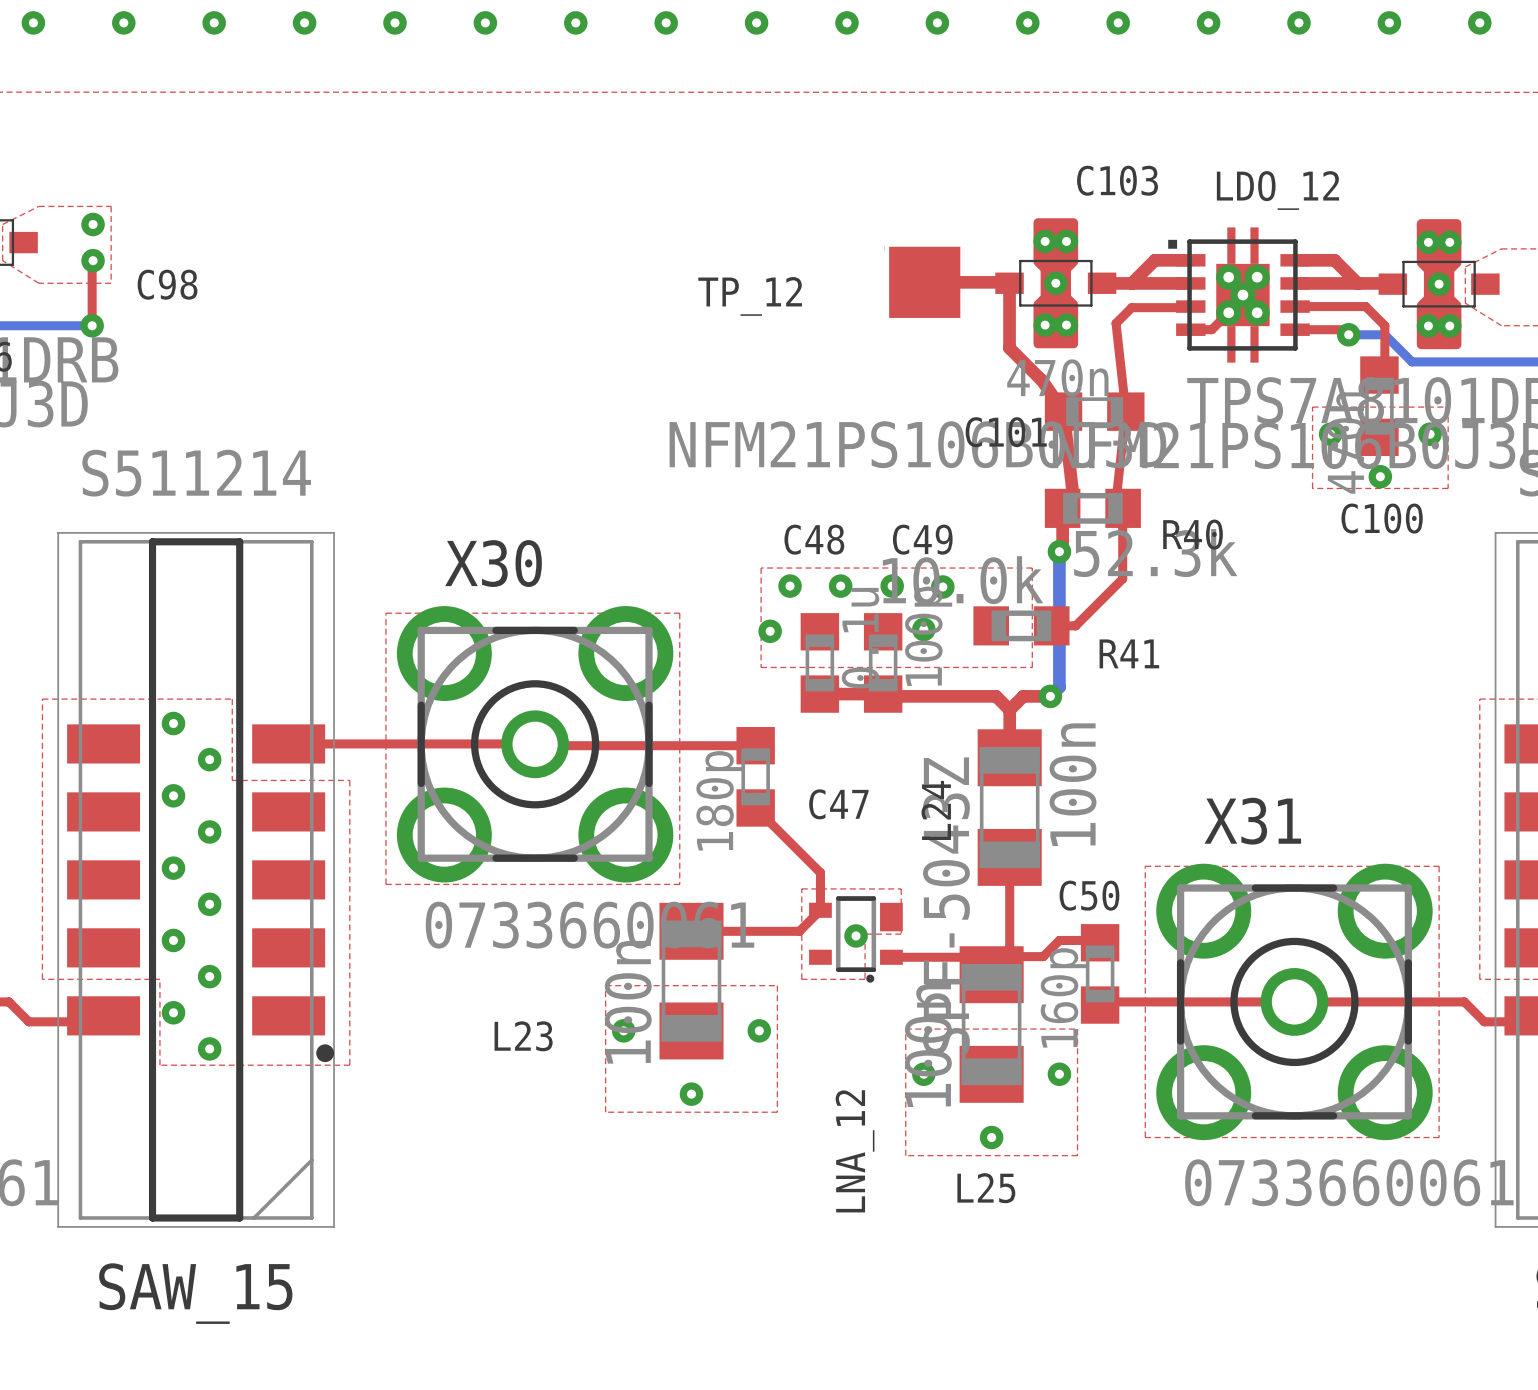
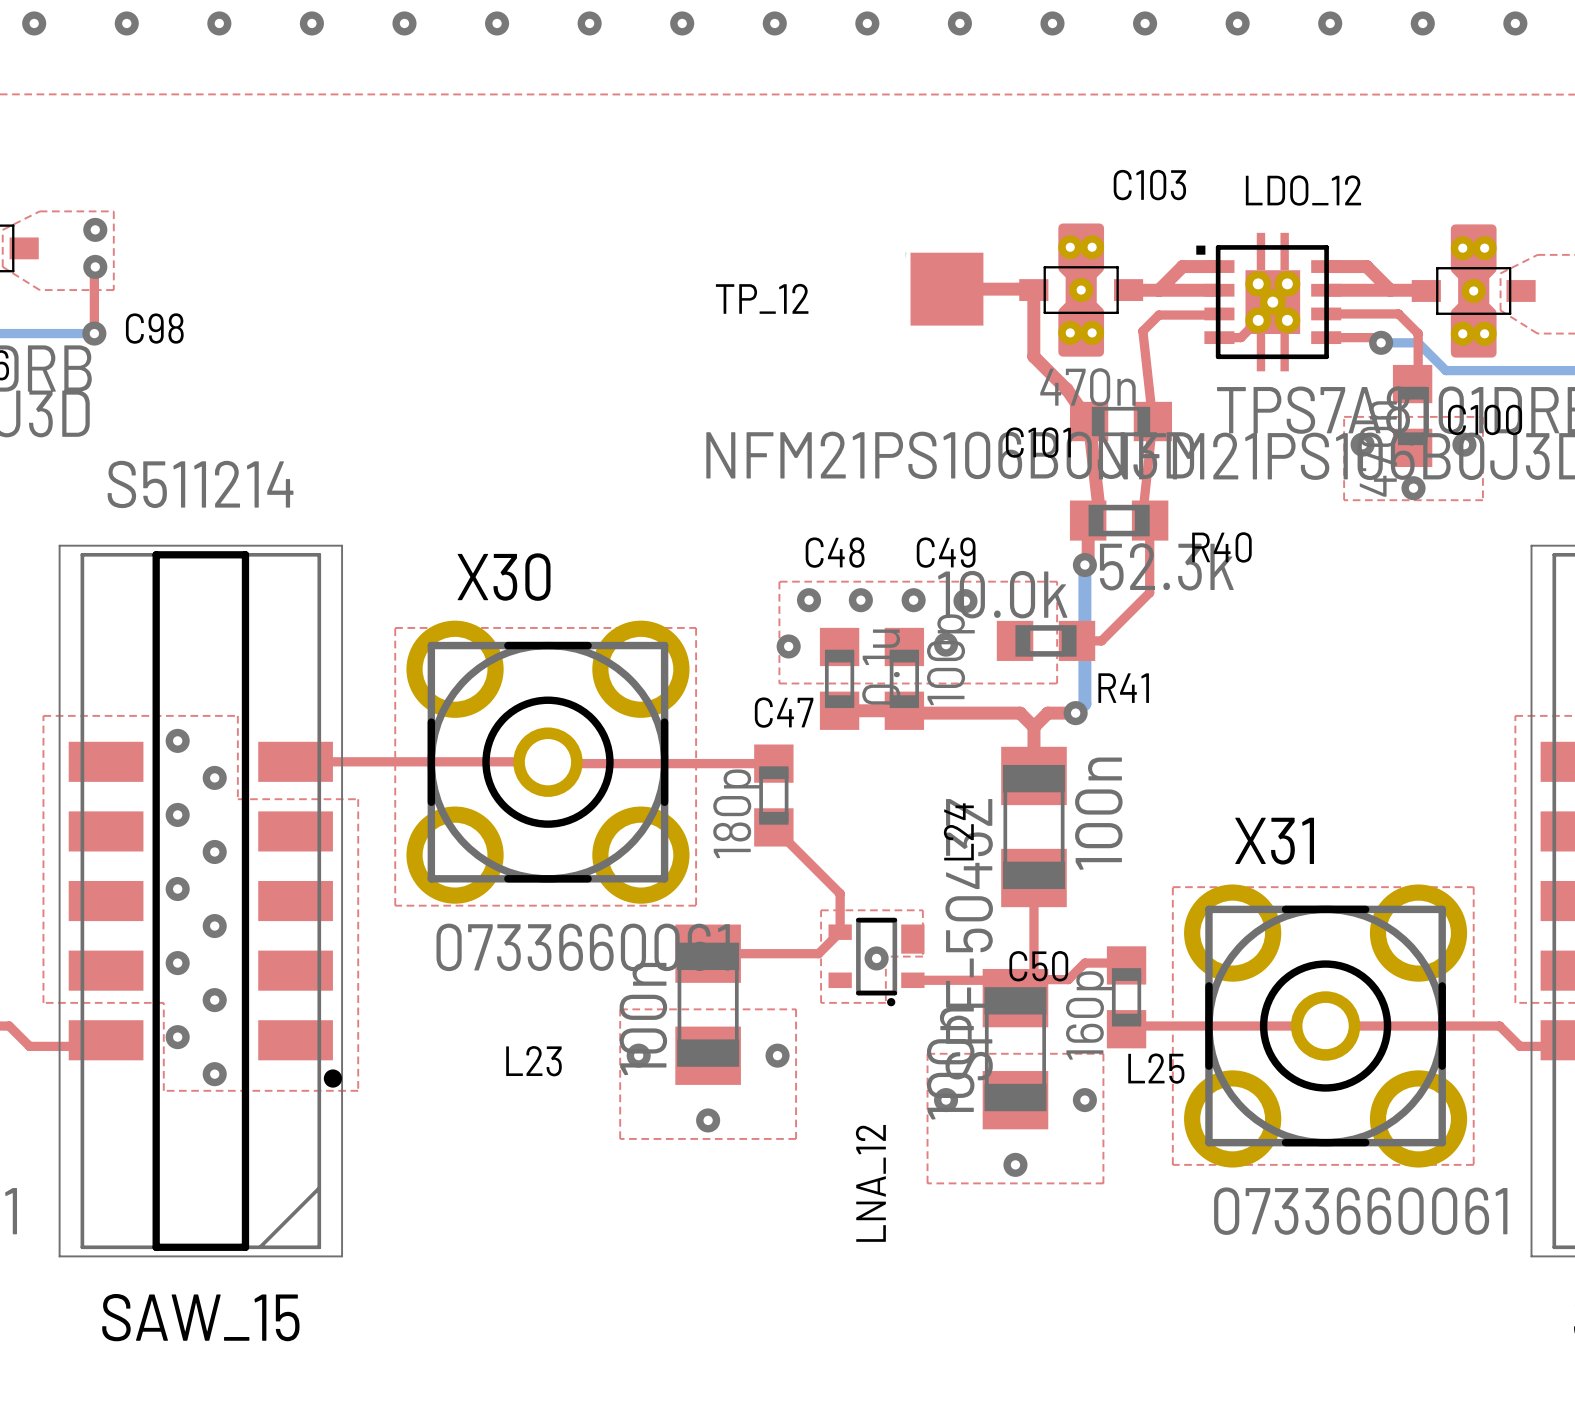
C98 name position: C98 (167, 284) -> C98 (154, 328)
C100 name position: C100 (1382, 518) -> C100 (1485, 419)
R41 name position: R41 (1129, 653) -> R41 (1123, 688)
C47 name position: C47 (838, 804) -> C47 (784, 712)
C50 name position: C50 (1089, 895) -> C50 (1038, 966)
L25 name position: L25 (986, 1188) -> L25 (1156, 1068)

